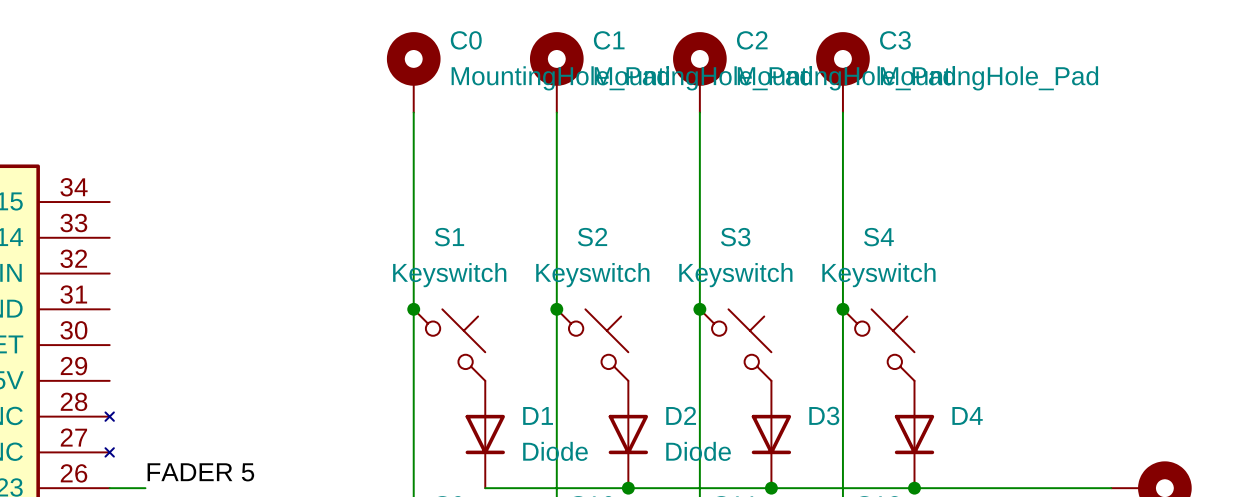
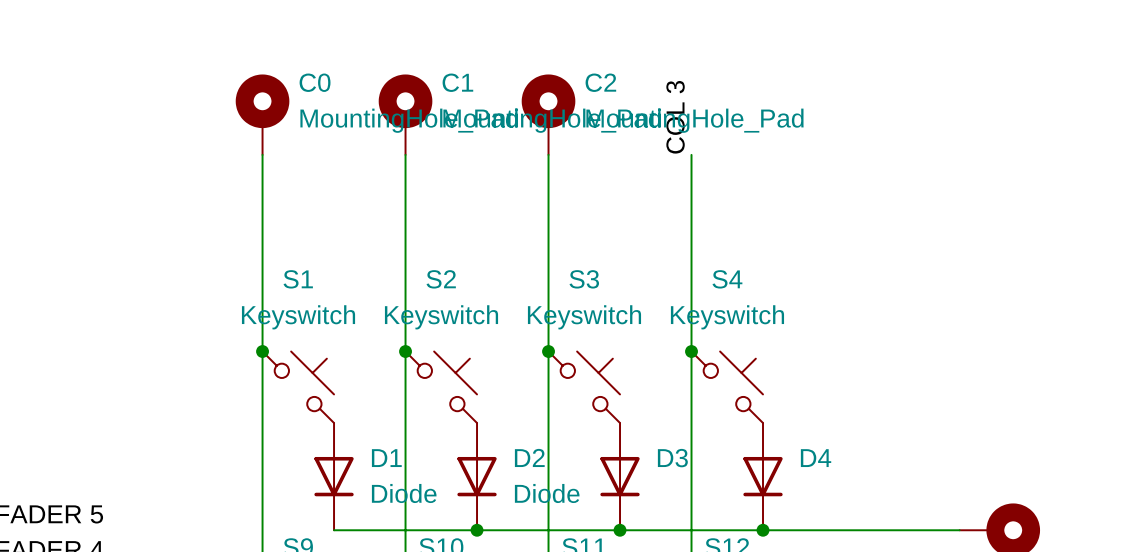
C3: MountingHole_Pad (842, 72) -> none
label: none -> COL 3 (675, 117)

